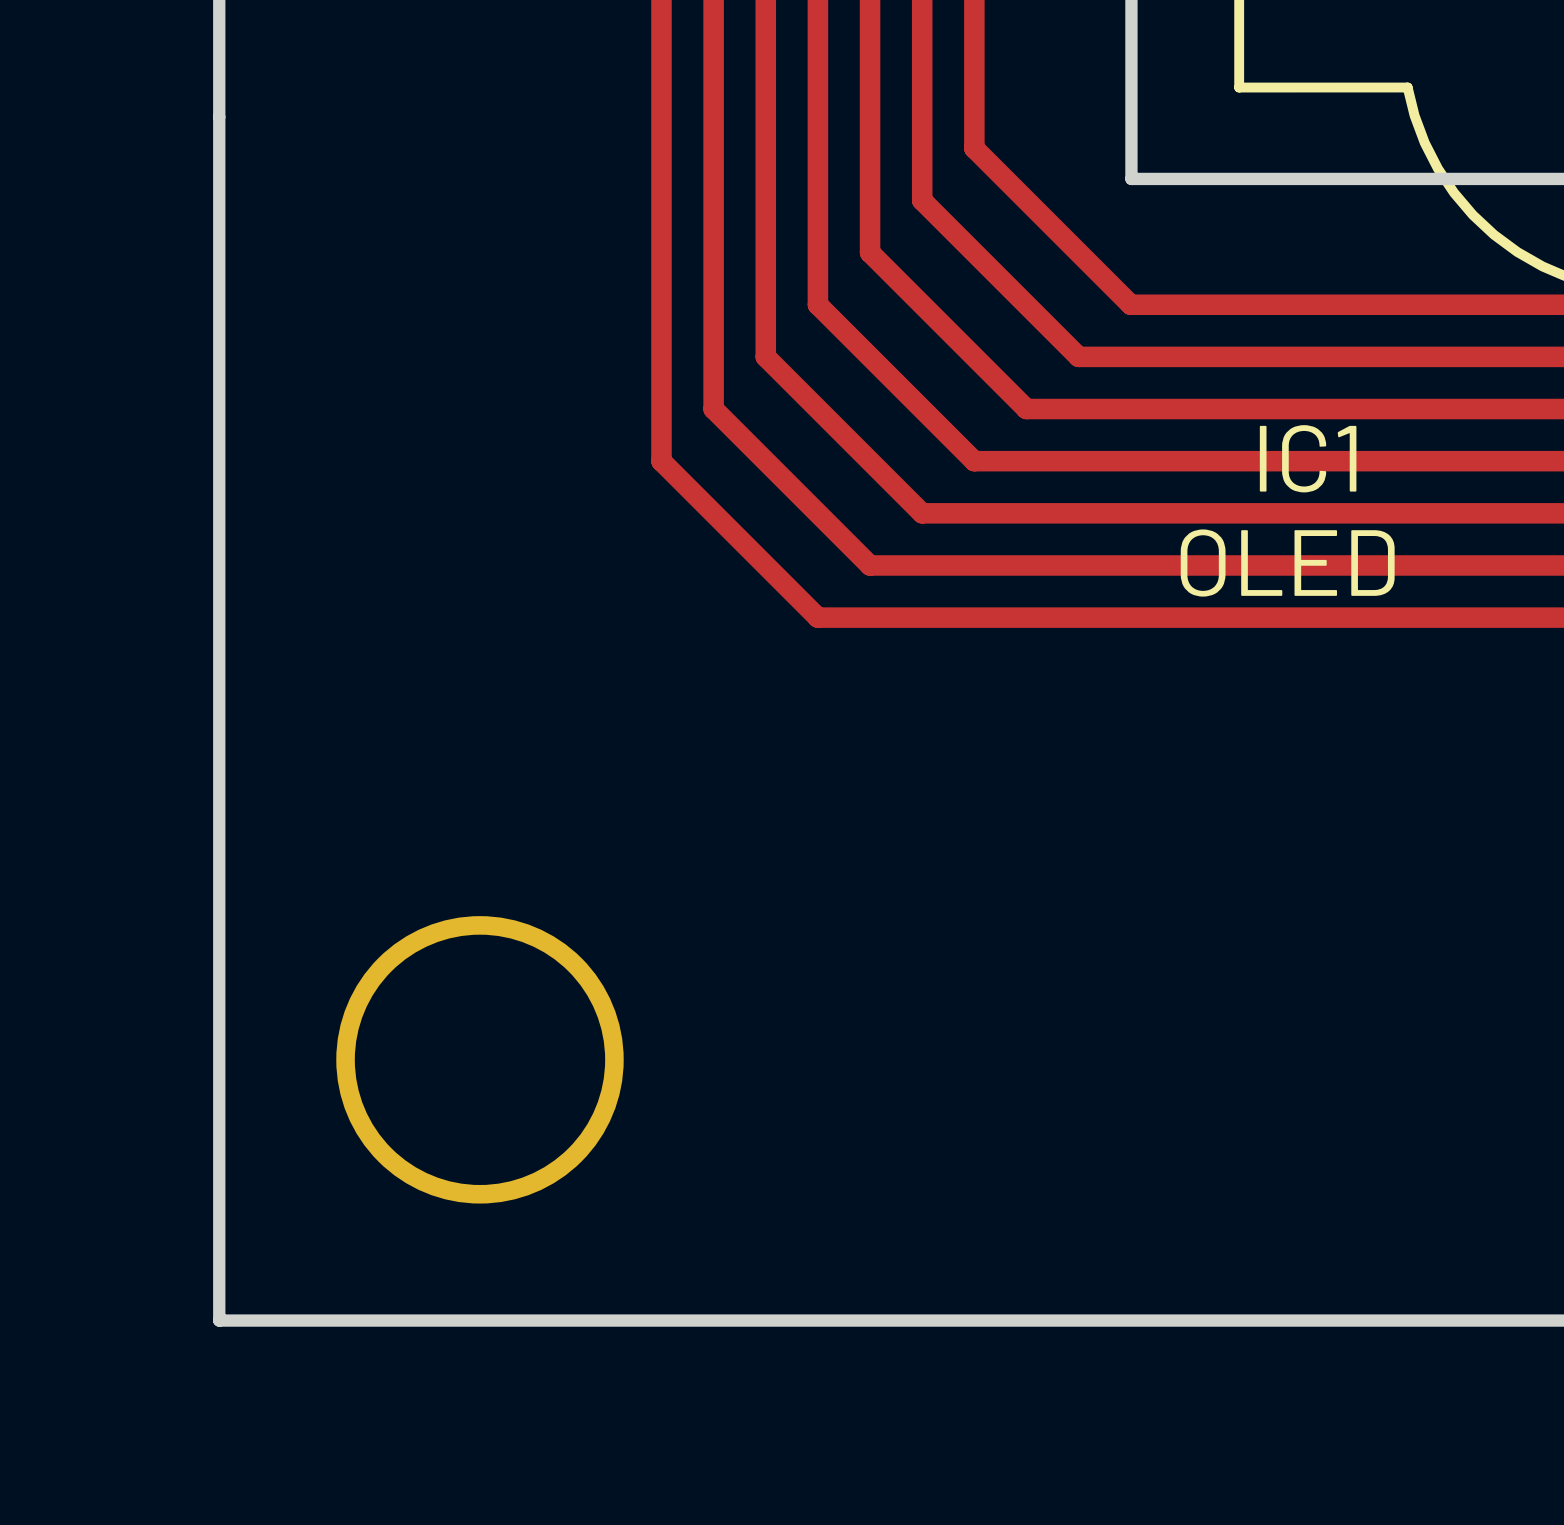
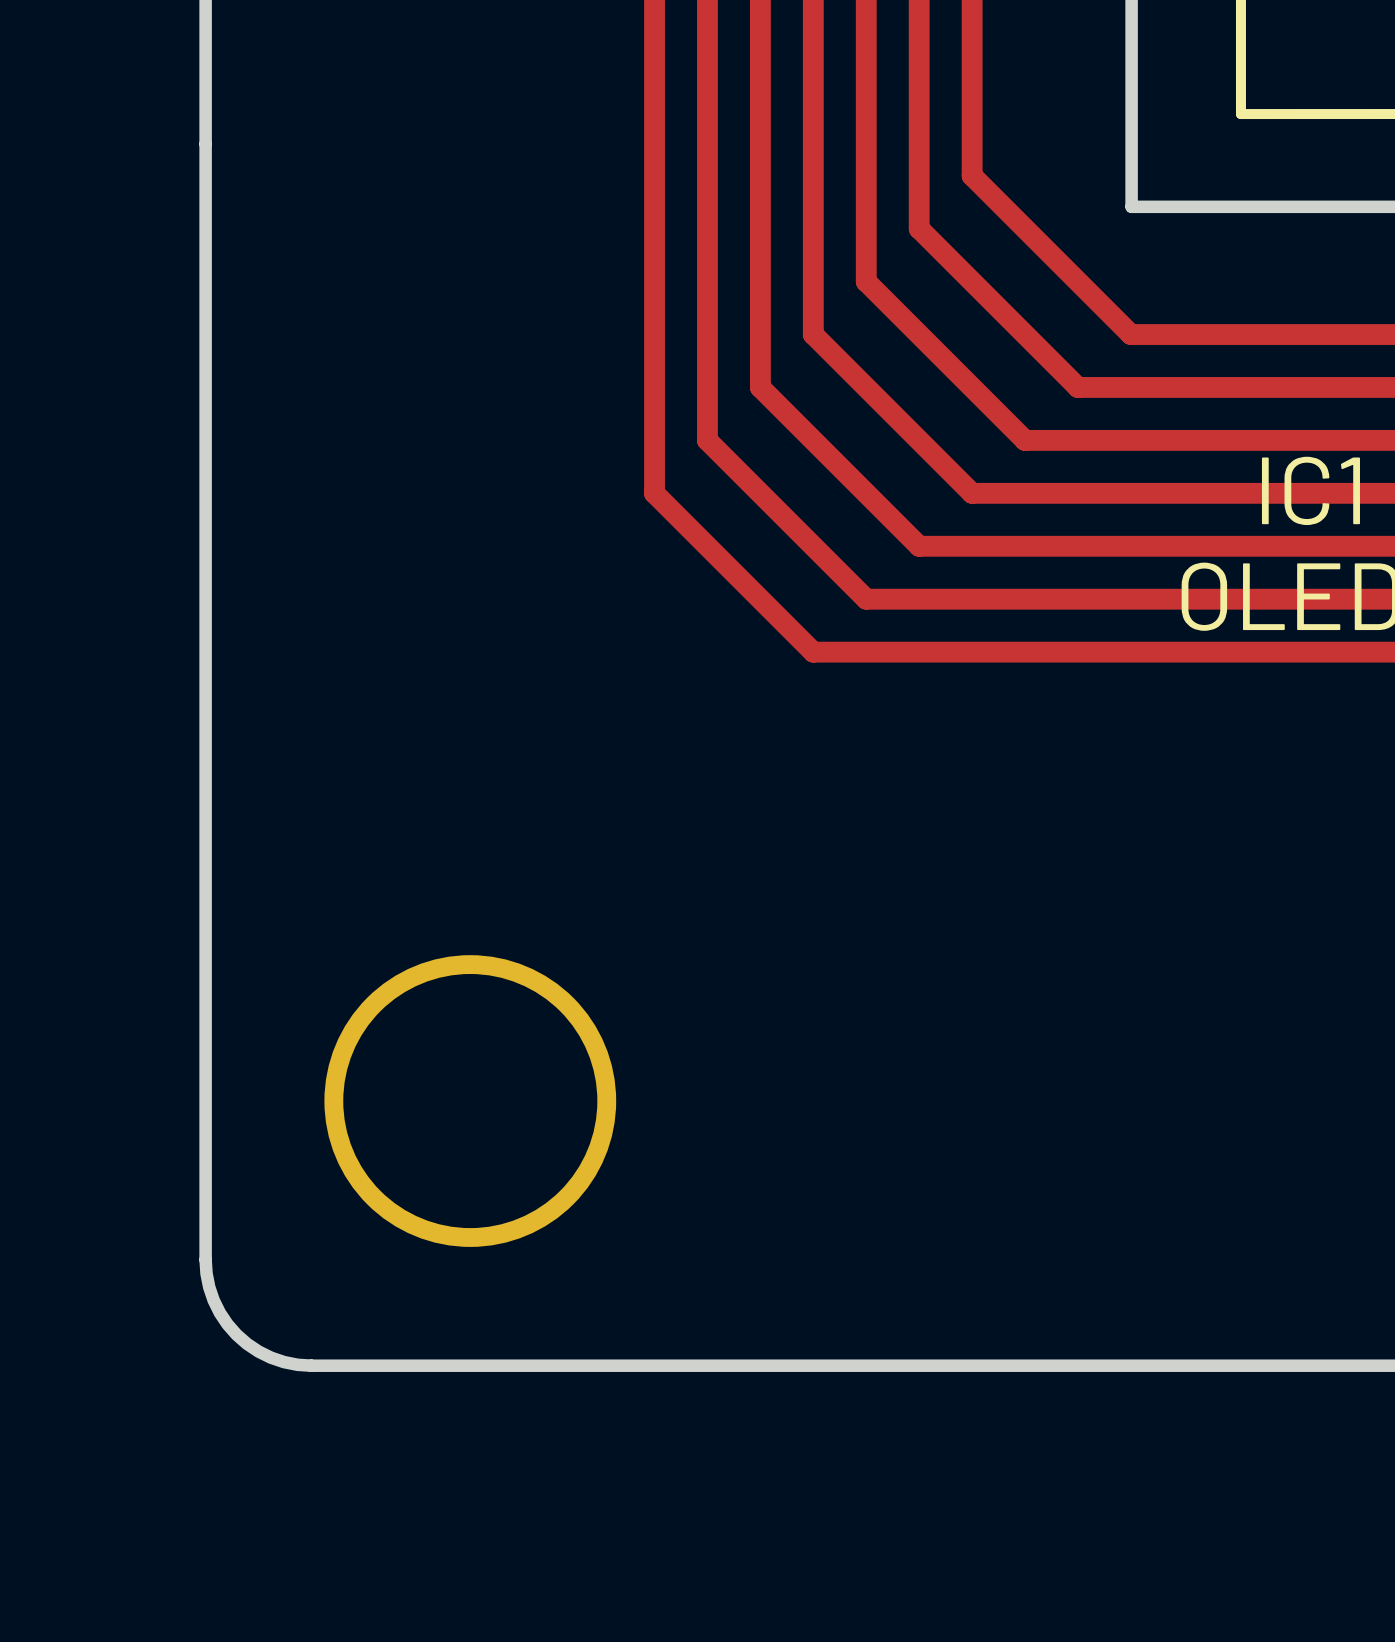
board edge: (219, 1216) (219, 1320) (323, 1320) -> (205, 1259) (206, 1273) (213, 1300) (219, 1312) (236, 1334) (258, 1351) (270, 1357) (284, 1362) (311, 1365)

